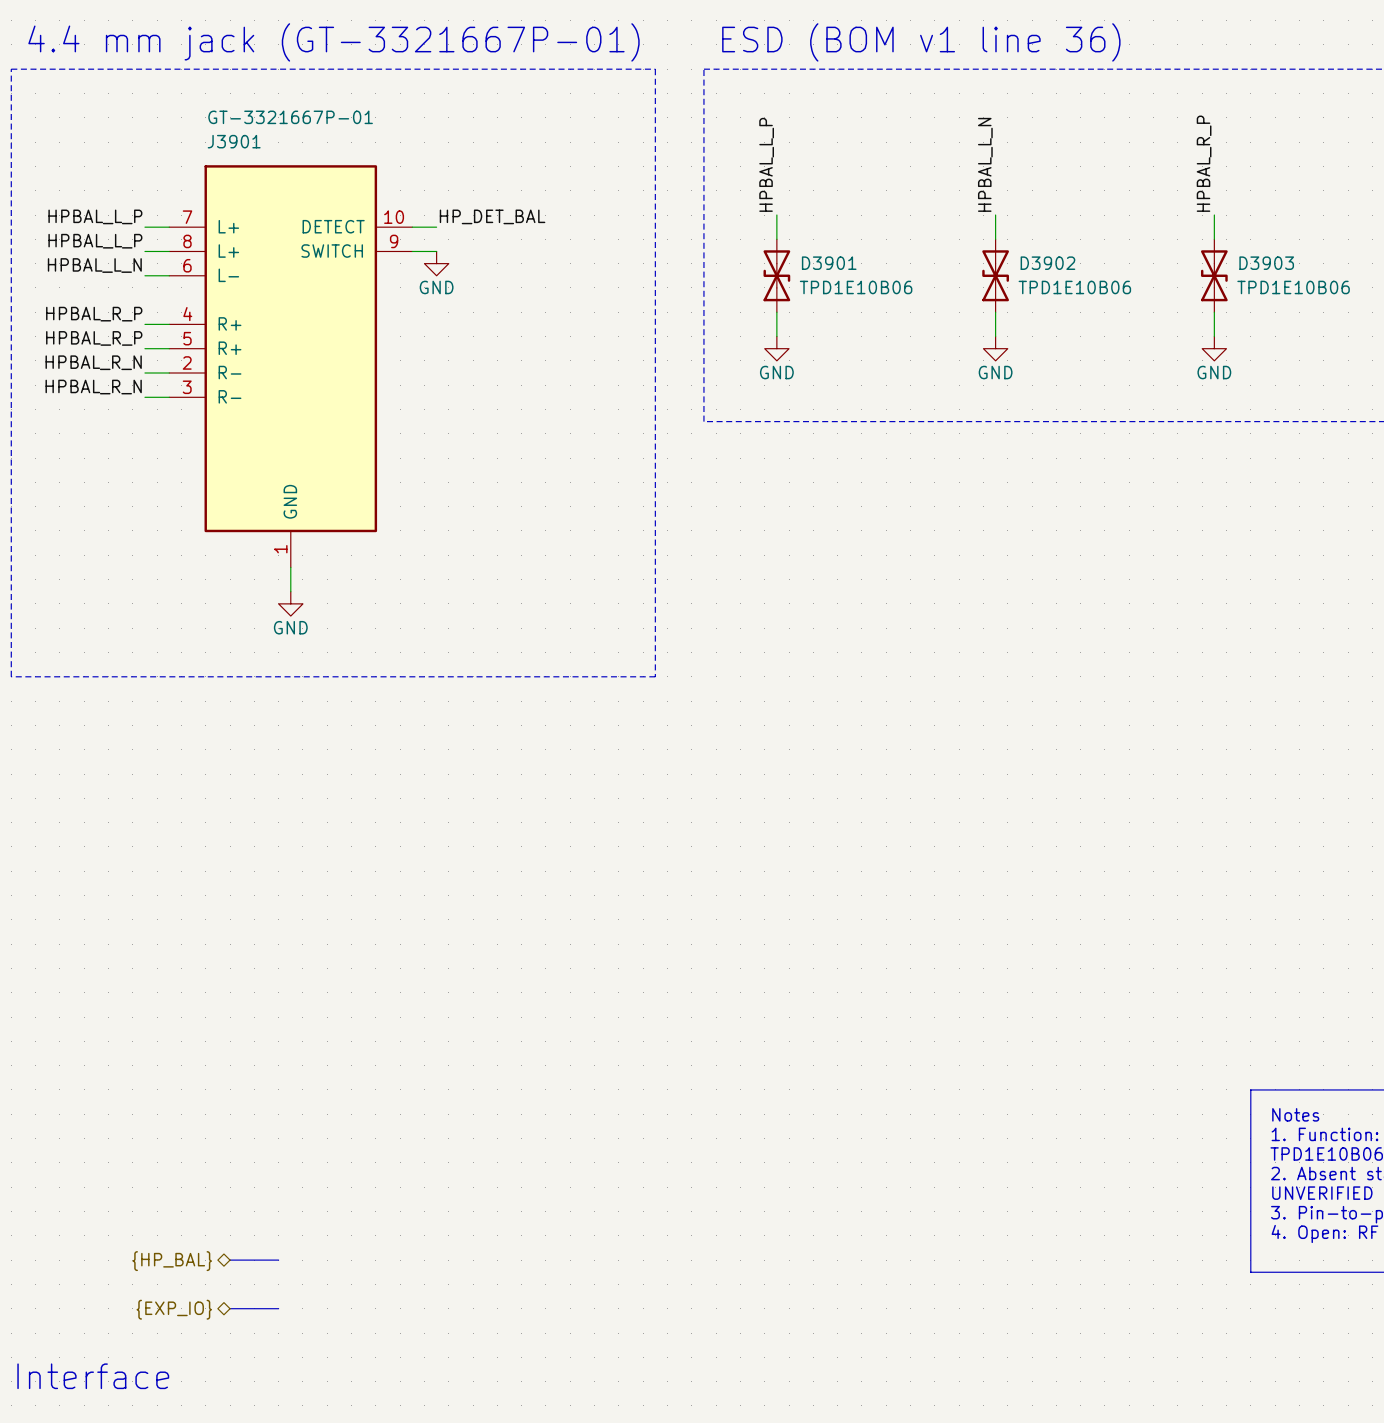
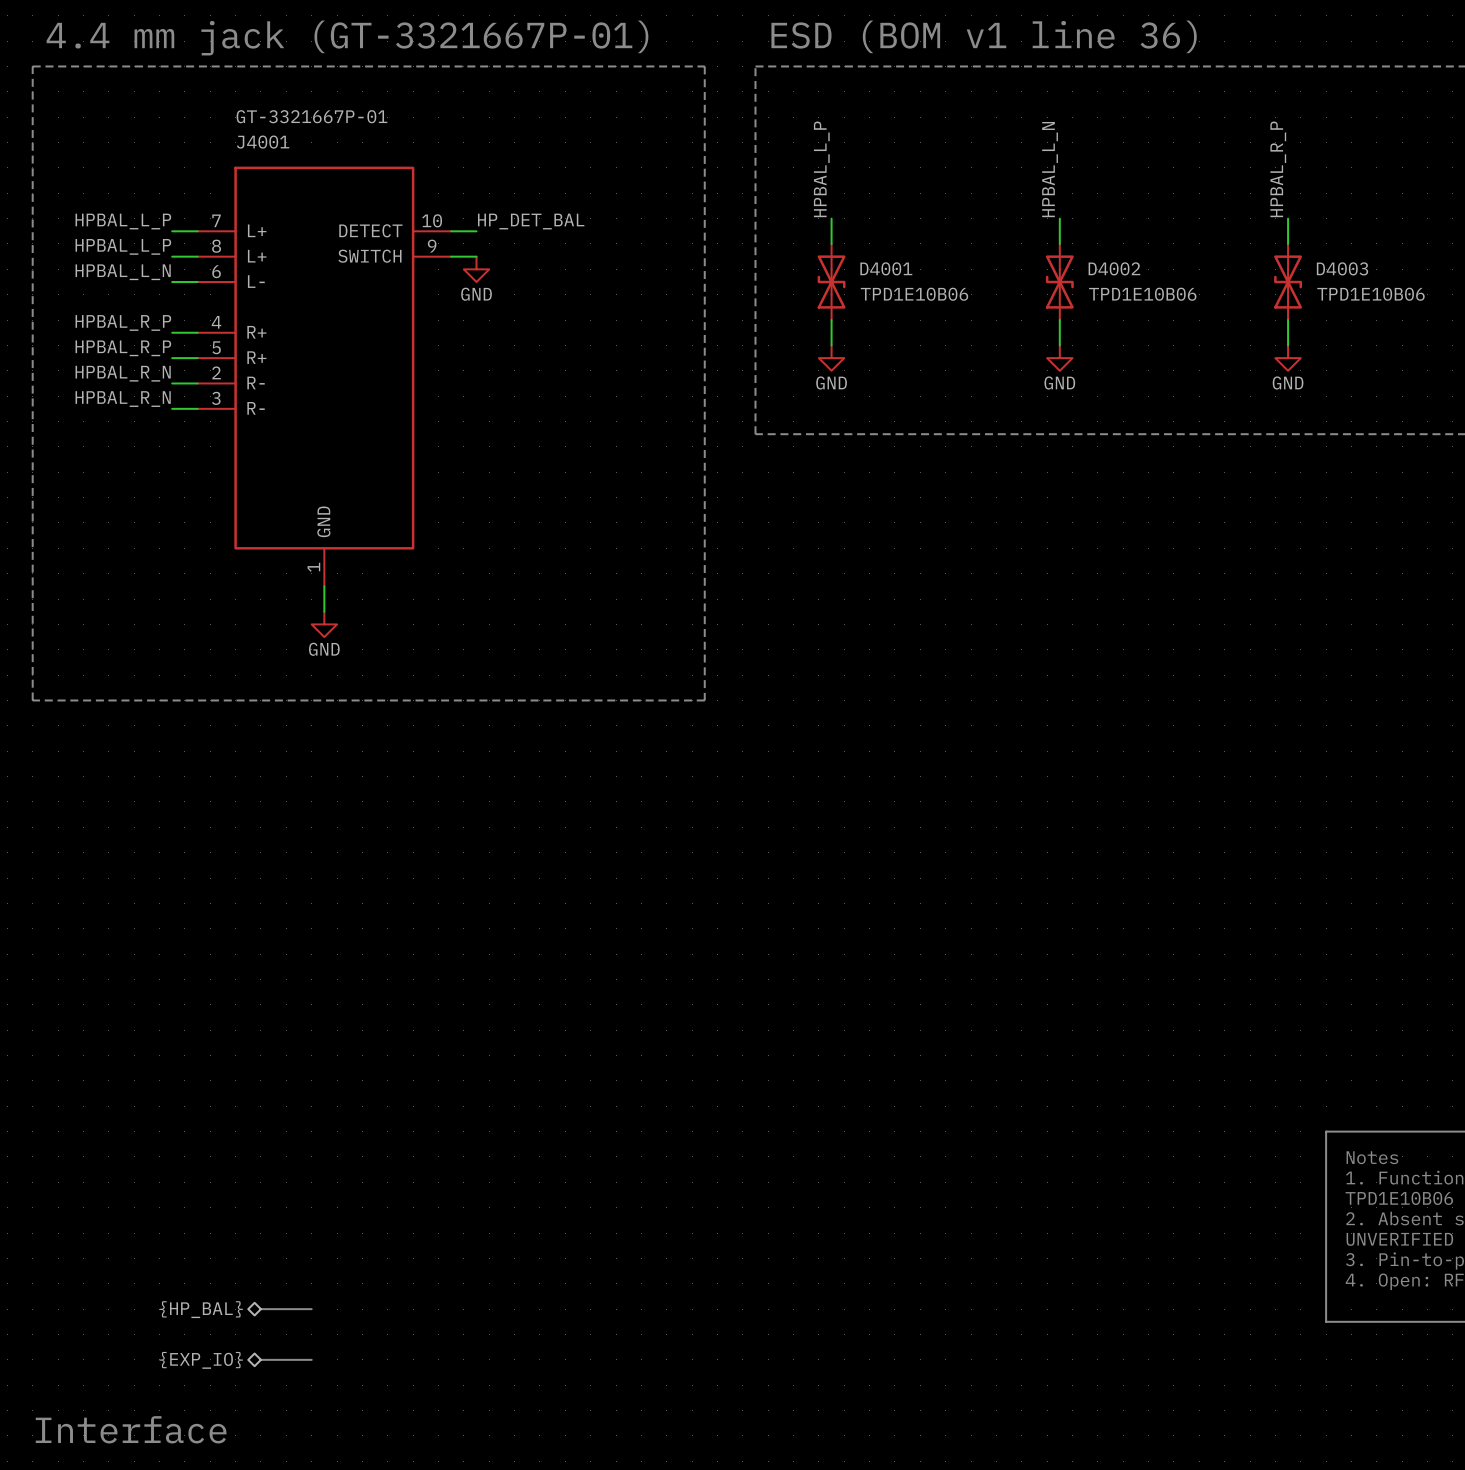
J3901 name: J3901 (234, 141) -> J4001 (263, 142)
D3901 name: D3901 (829, 263) -> D4001 (886, 268)
D3902 name: D3902 (1047, 263) -> D4002 (1114, 268)
D3903 name: D3903 (1266, 263) -> D4003 (1342, 268)

